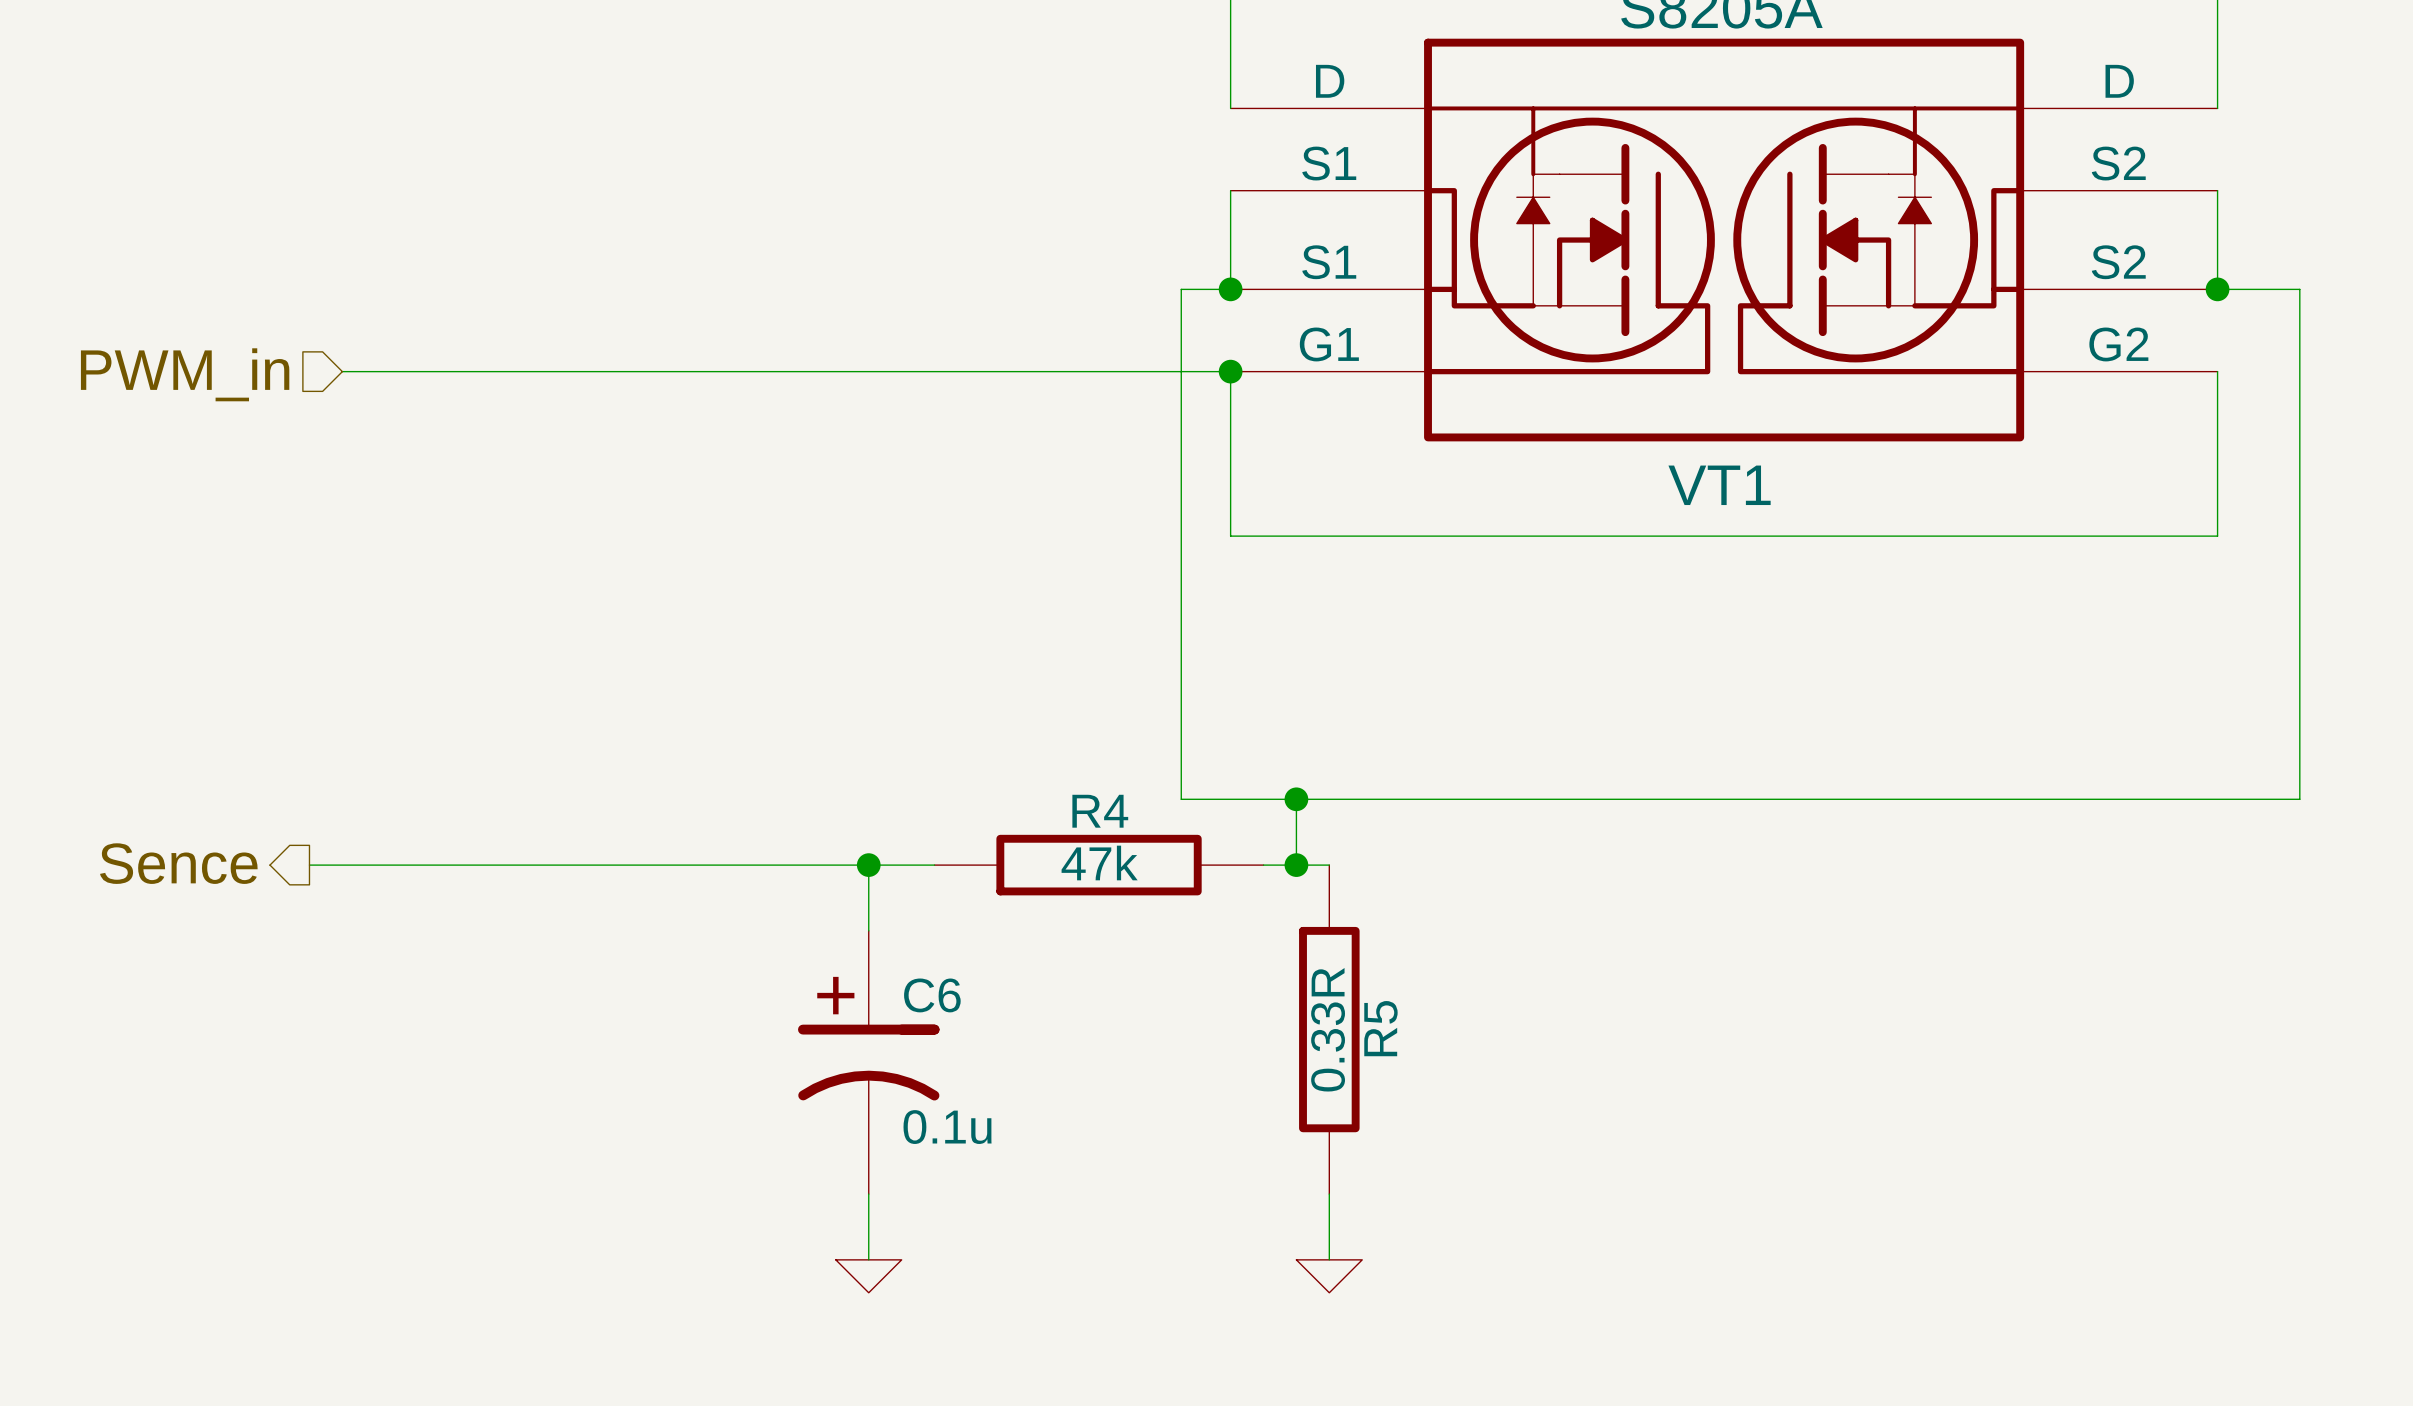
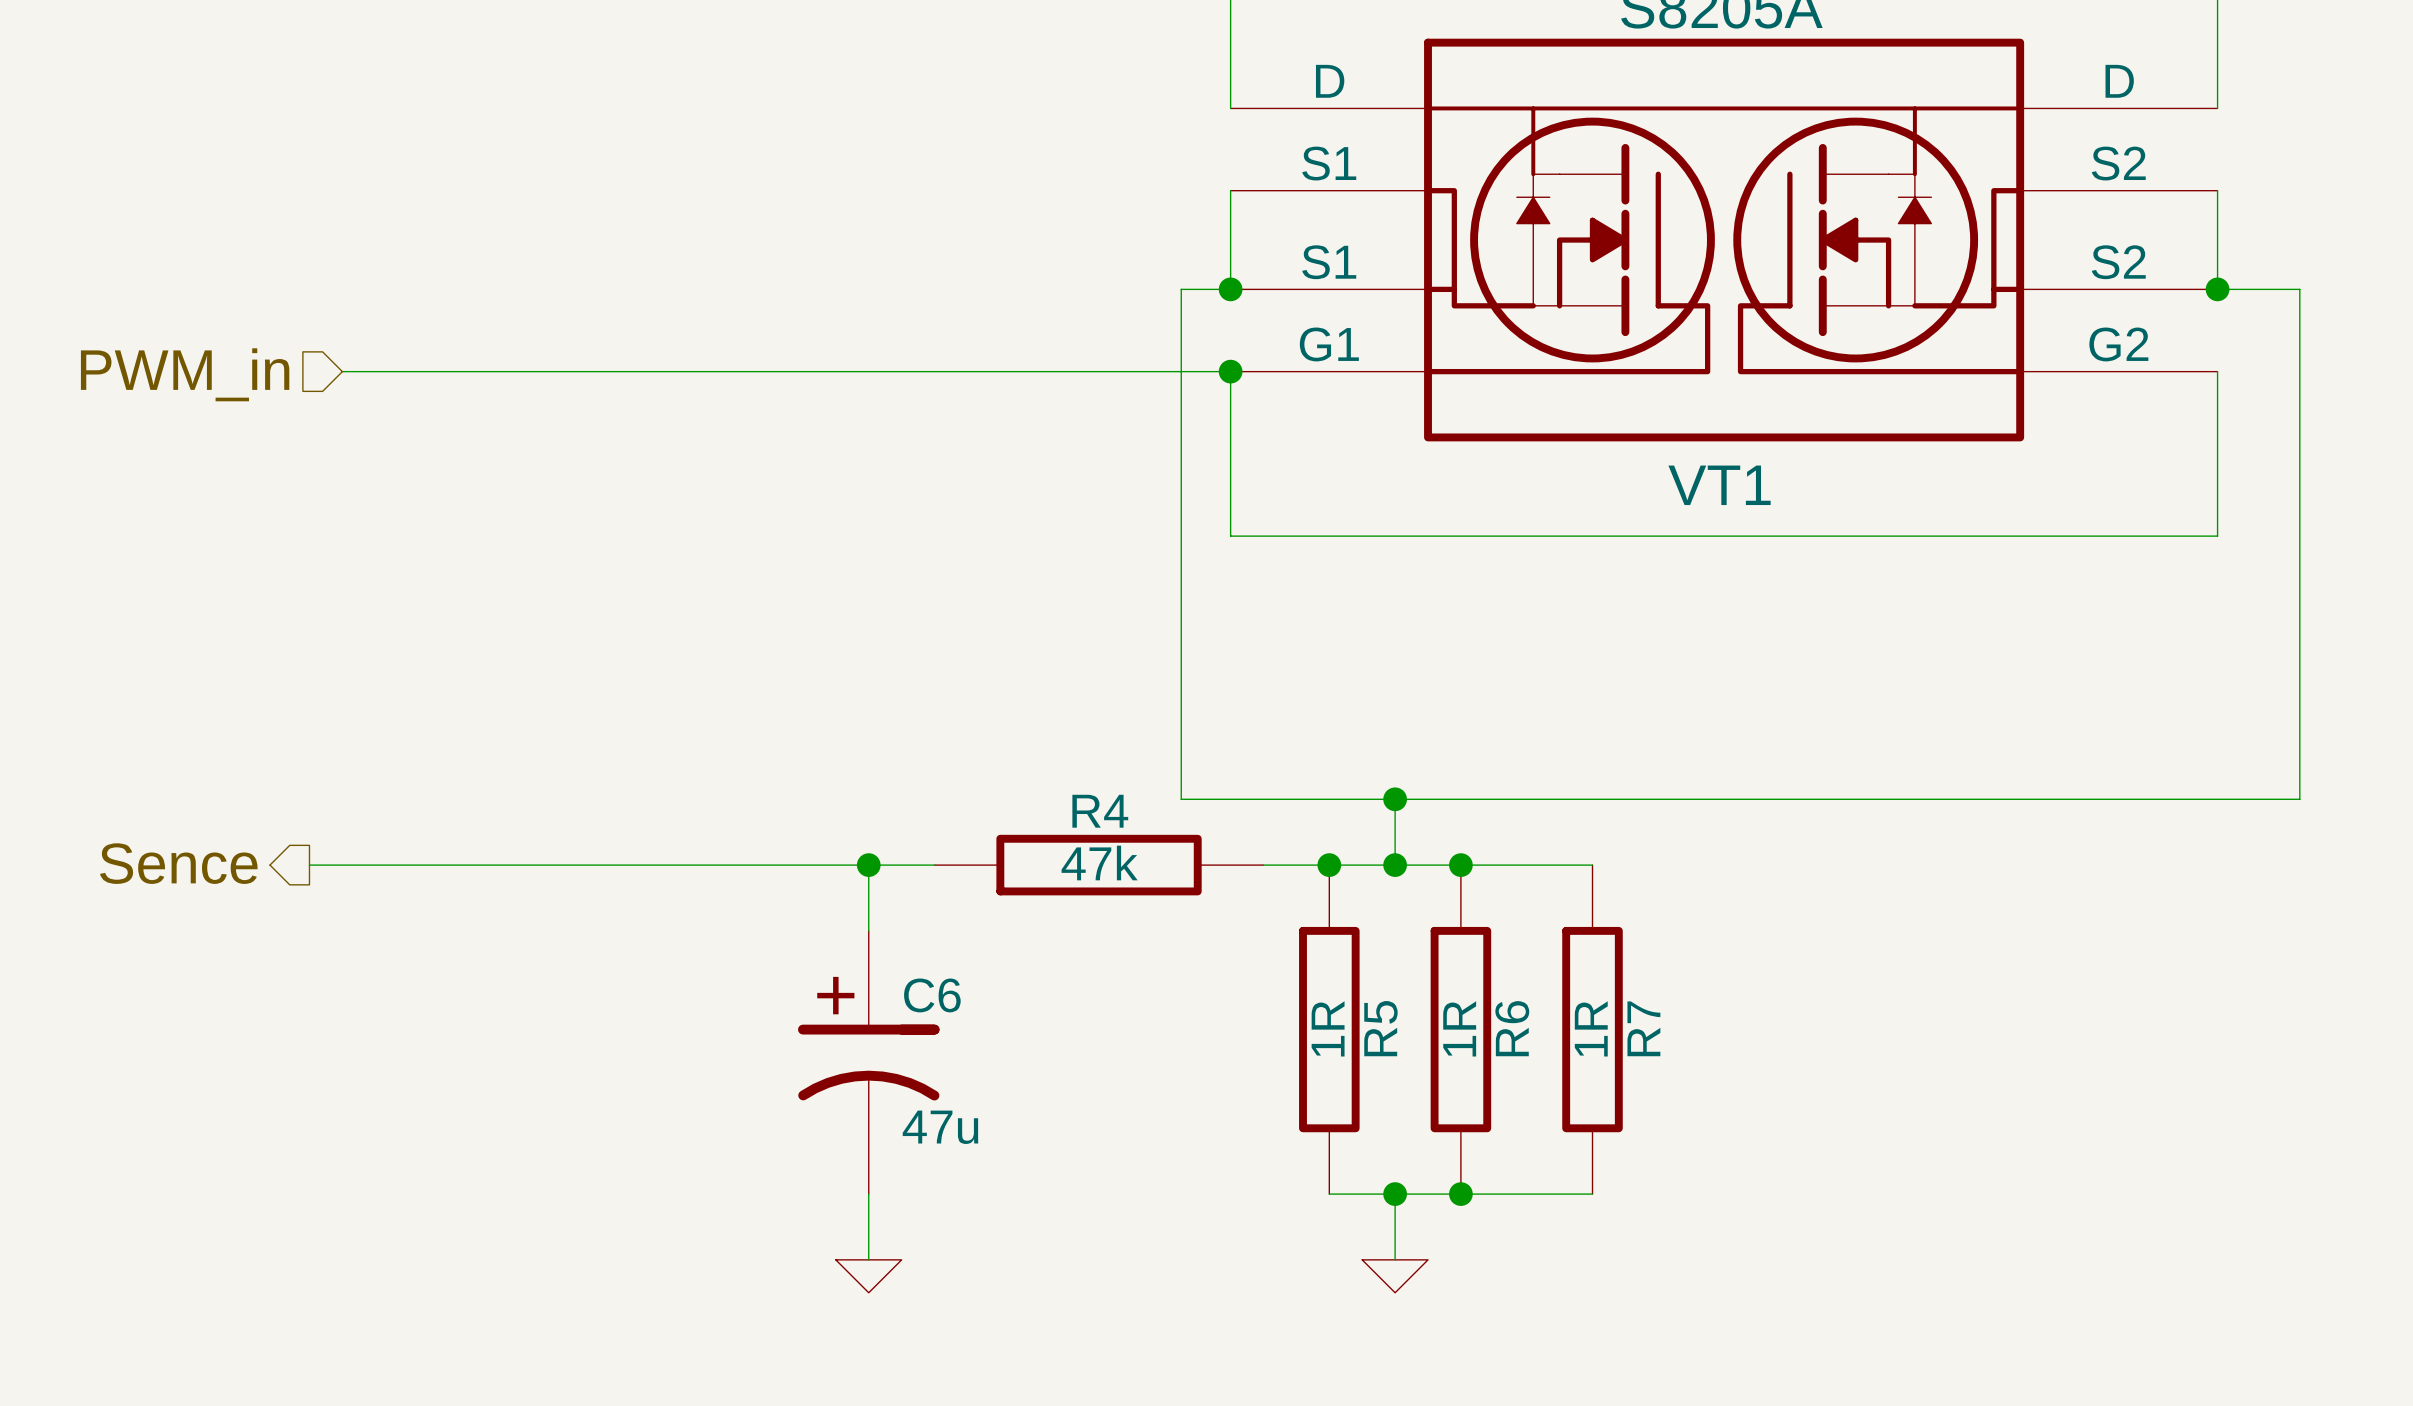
wire: (1296, 799) (1296, 865) -> (1395, 799) (1395, 865)
junction: (1296, 799) -> none
junction: none -> (1395, 799)
junction position: (1296, 865) -> (1329, 865)
wire: none -> (1329, 865) (1592, 865)
junction: none -> (1395, 865)
junction: none -> (1460, 865)
R5 value: 0.33R (1328, 1029) -> 1R (1328, 1028)
R6: none -> 1R (1460, 1029)
R7: none -> 1R (1592, 1029)
C6 value: 0.1u (947, 1127) -> 47u (940, 1127)
wire: (1329, 1194) (1329, 1259) -> (1329, 1194) (1592, 1194)
wire: none -> (1395, 1194) (1395, 1259)
junction: none -> (1395, 1194)
junction: none -> (1460, 1194)
power symbol position: (1329, 1276) -> (1395, 1276)

